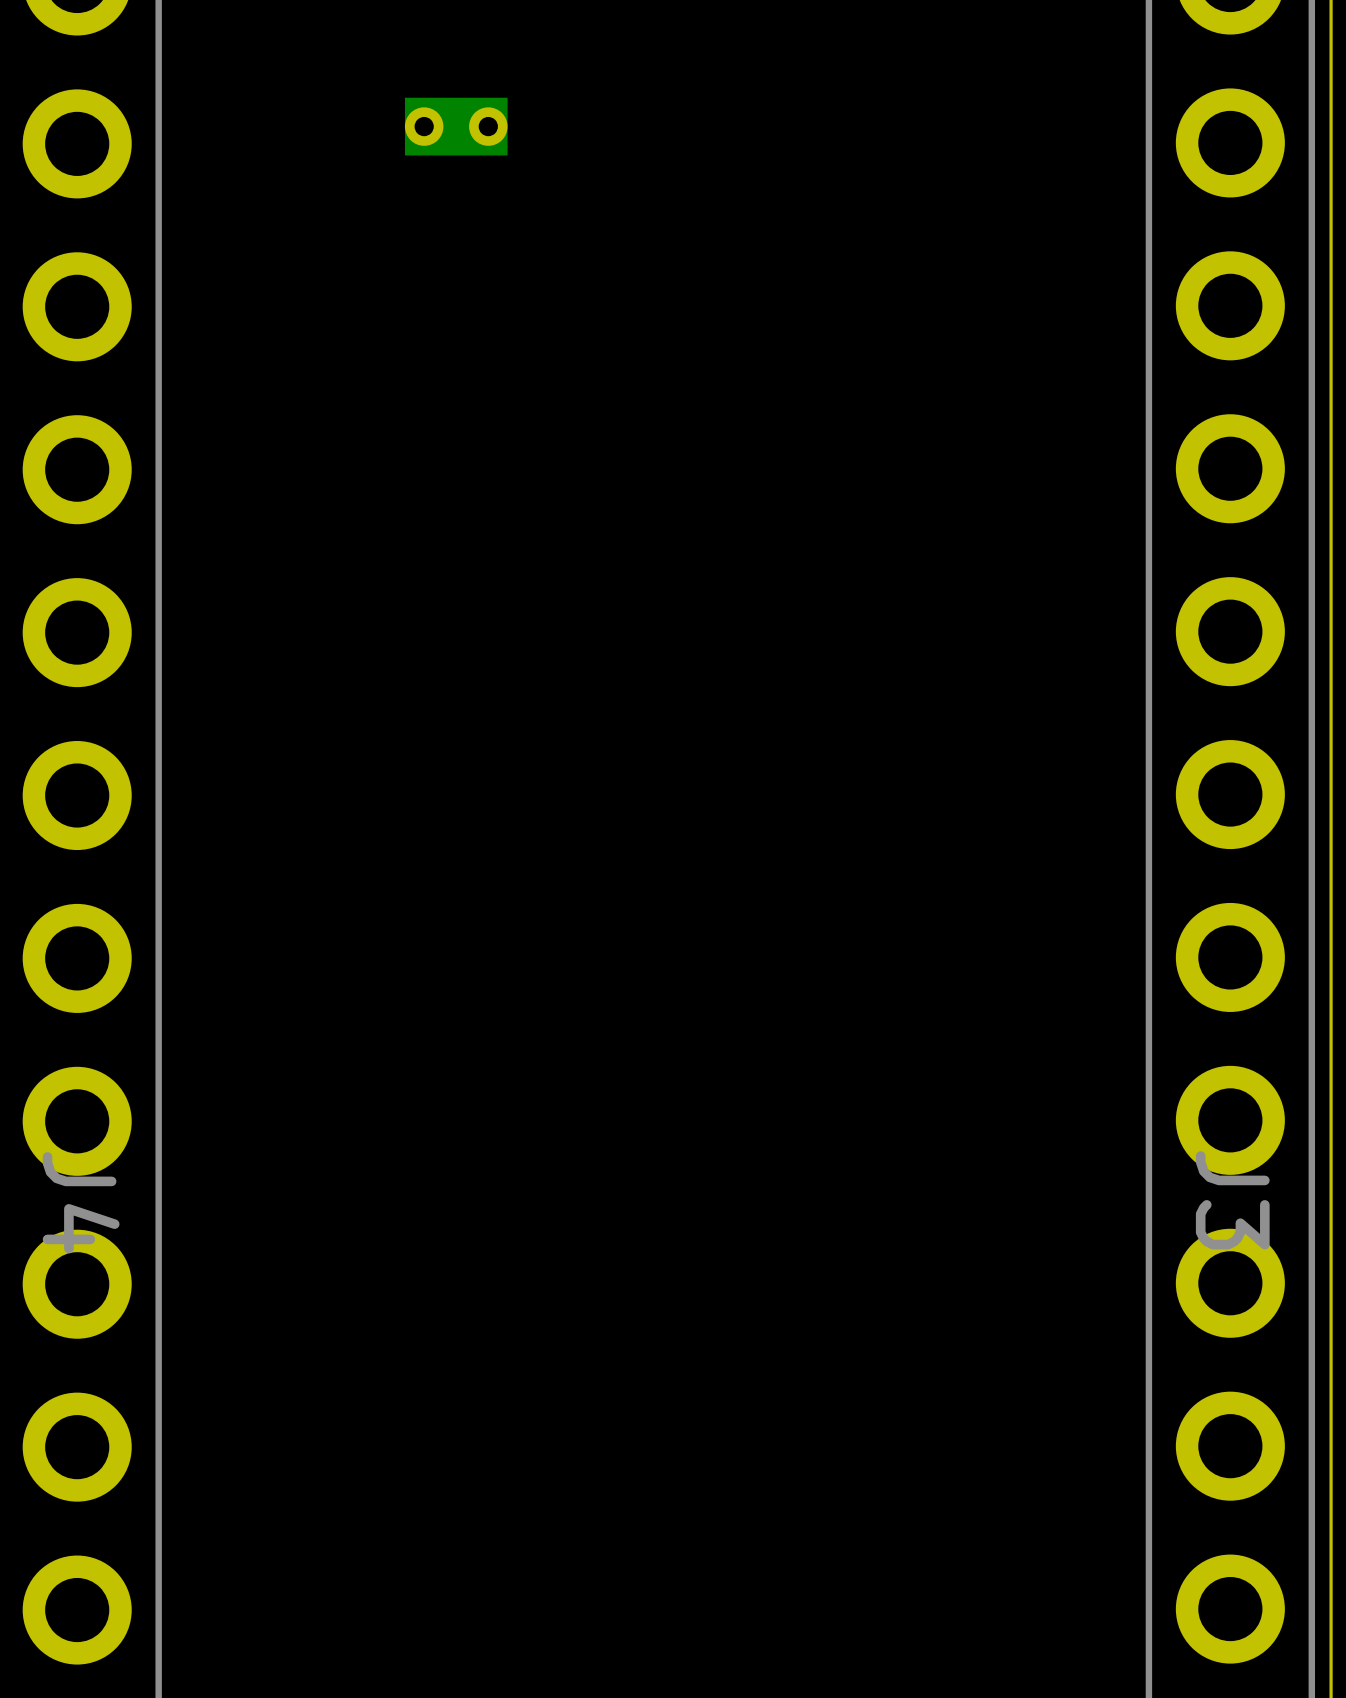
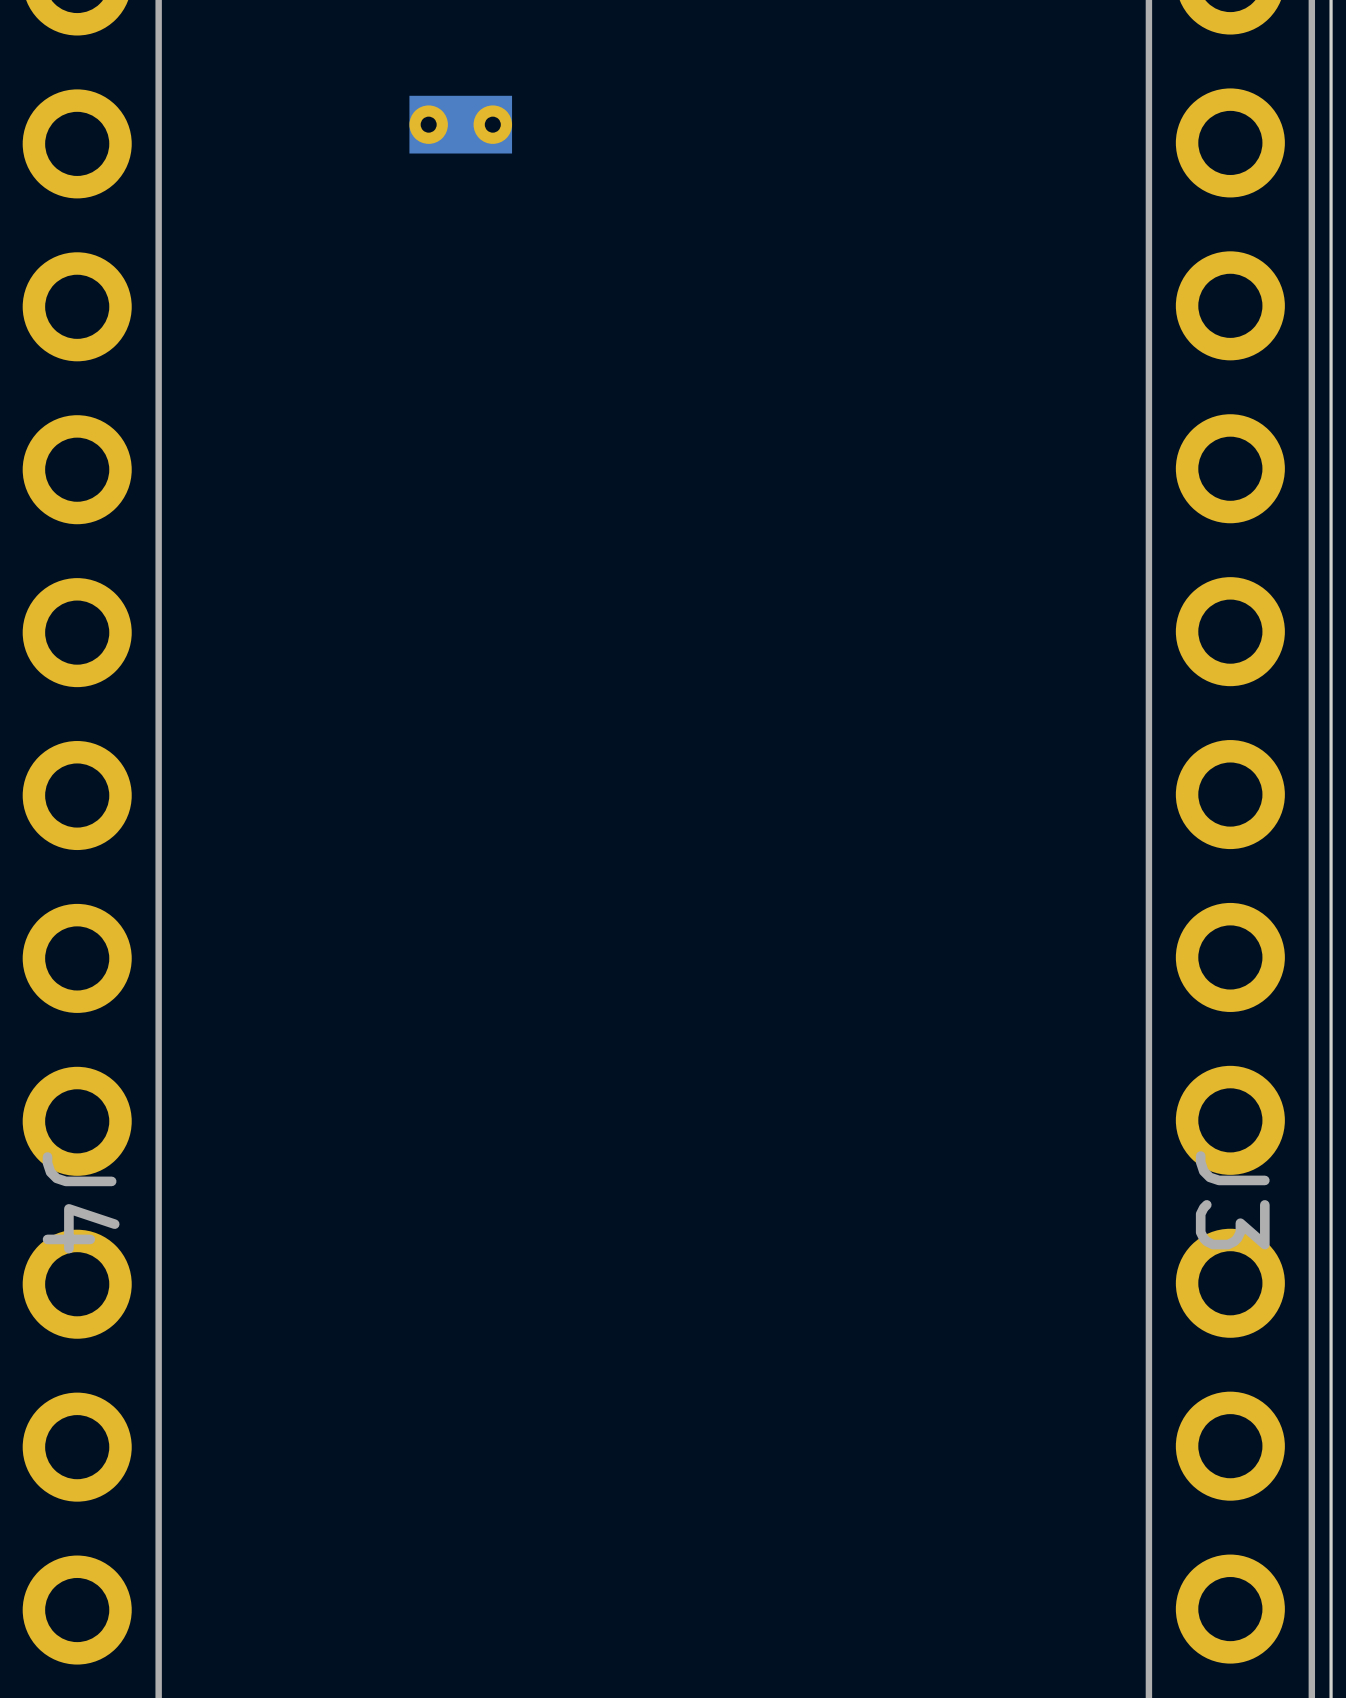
part footprint: [404, 97, 508, 156] -> [409, 95, 513, 154]

